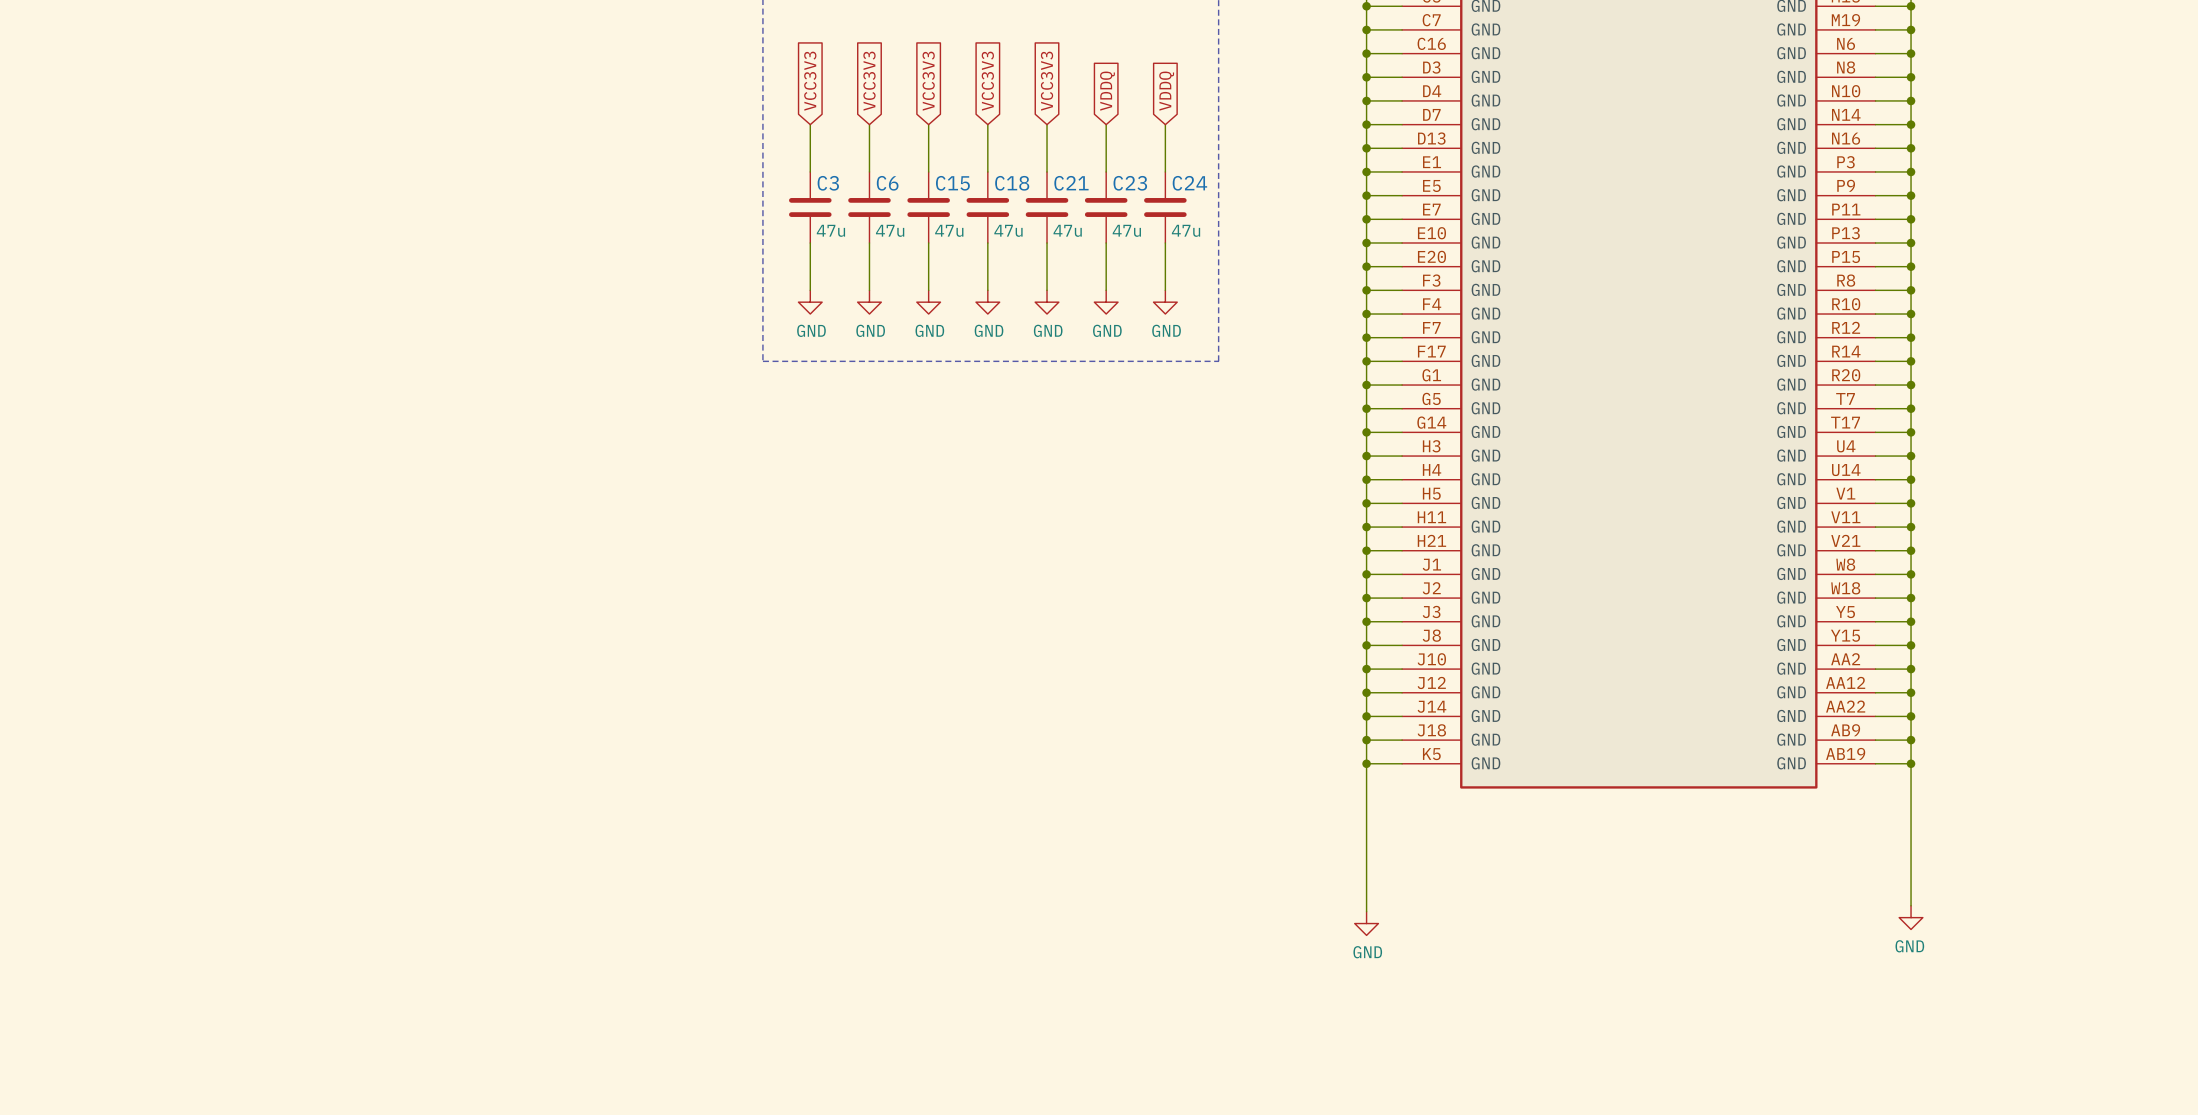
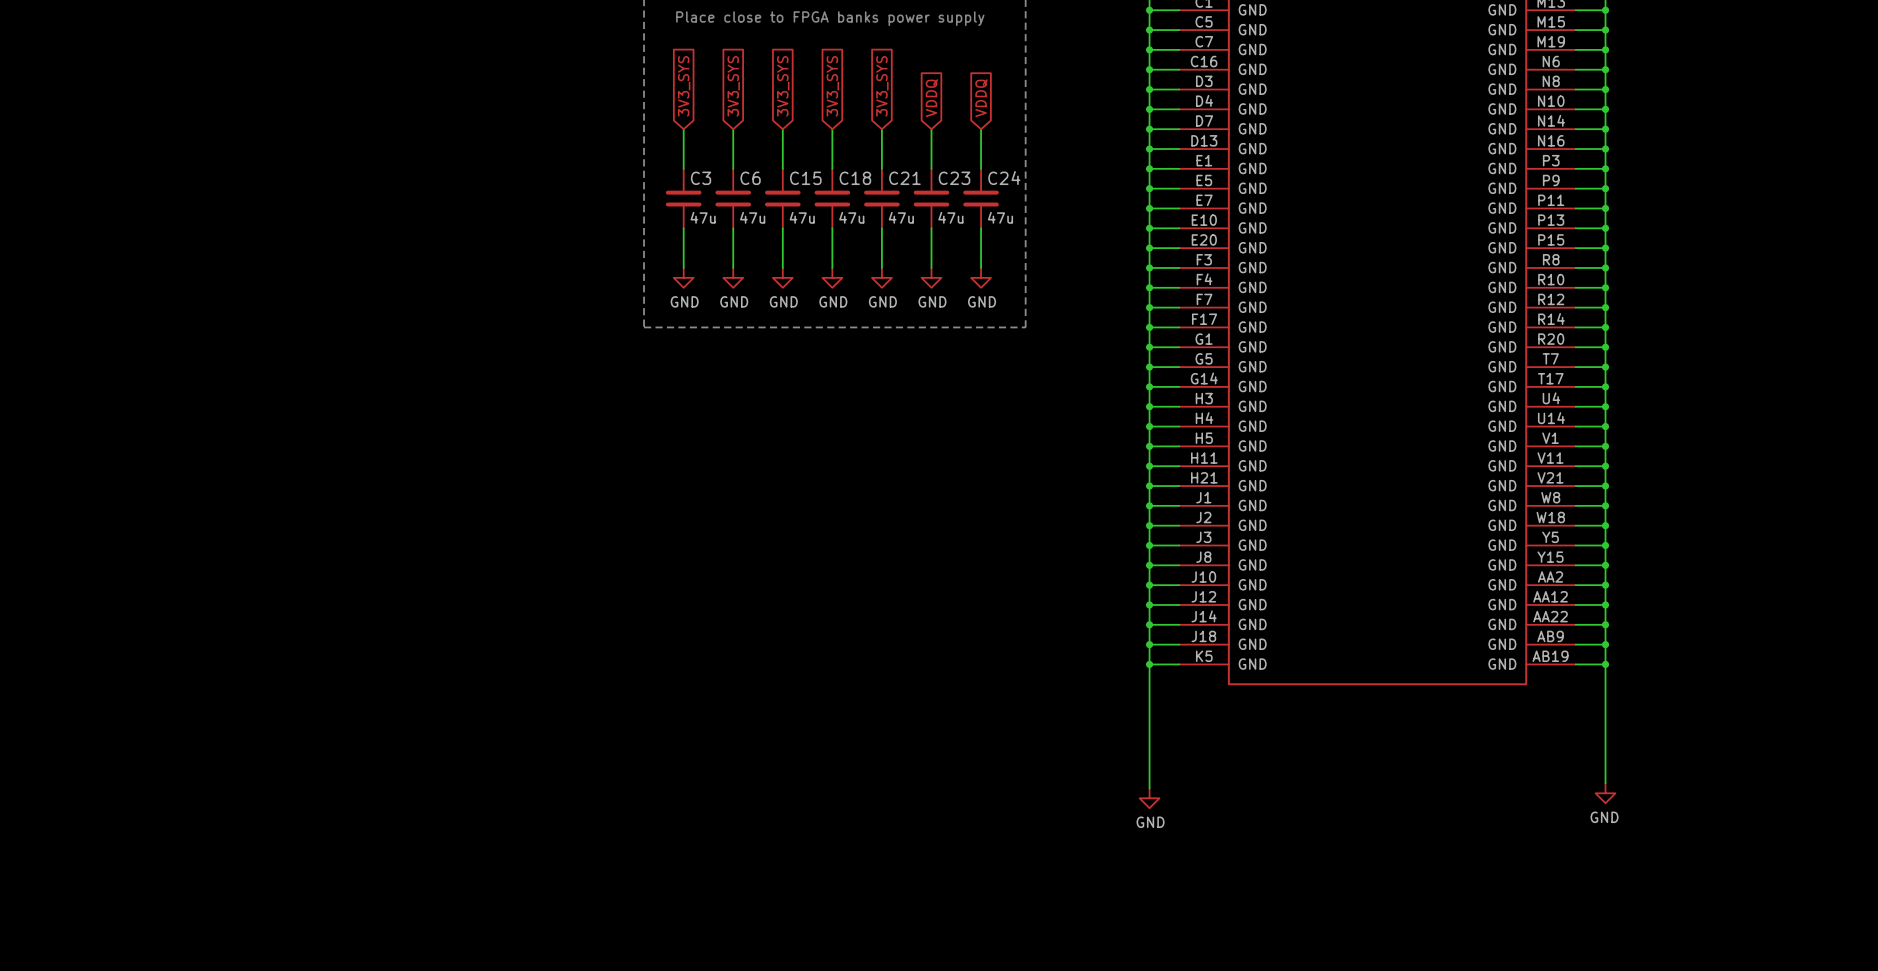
global label: VCC3V3 (810, 81) -> 3V3_SYS (684, 86)
global label: VCC3V3 (869, 81) -> 3V3_SYS (733, 86)
global label: VCC3V3 (928, 81) -> 3V3_SYS (783, 86)
global label: VCC3V3 (987, 81) -> 3V3_SYS (832, 86)
global label: VCC3V3 (1047, 81) -> 3V3_SYS (882, 86)

